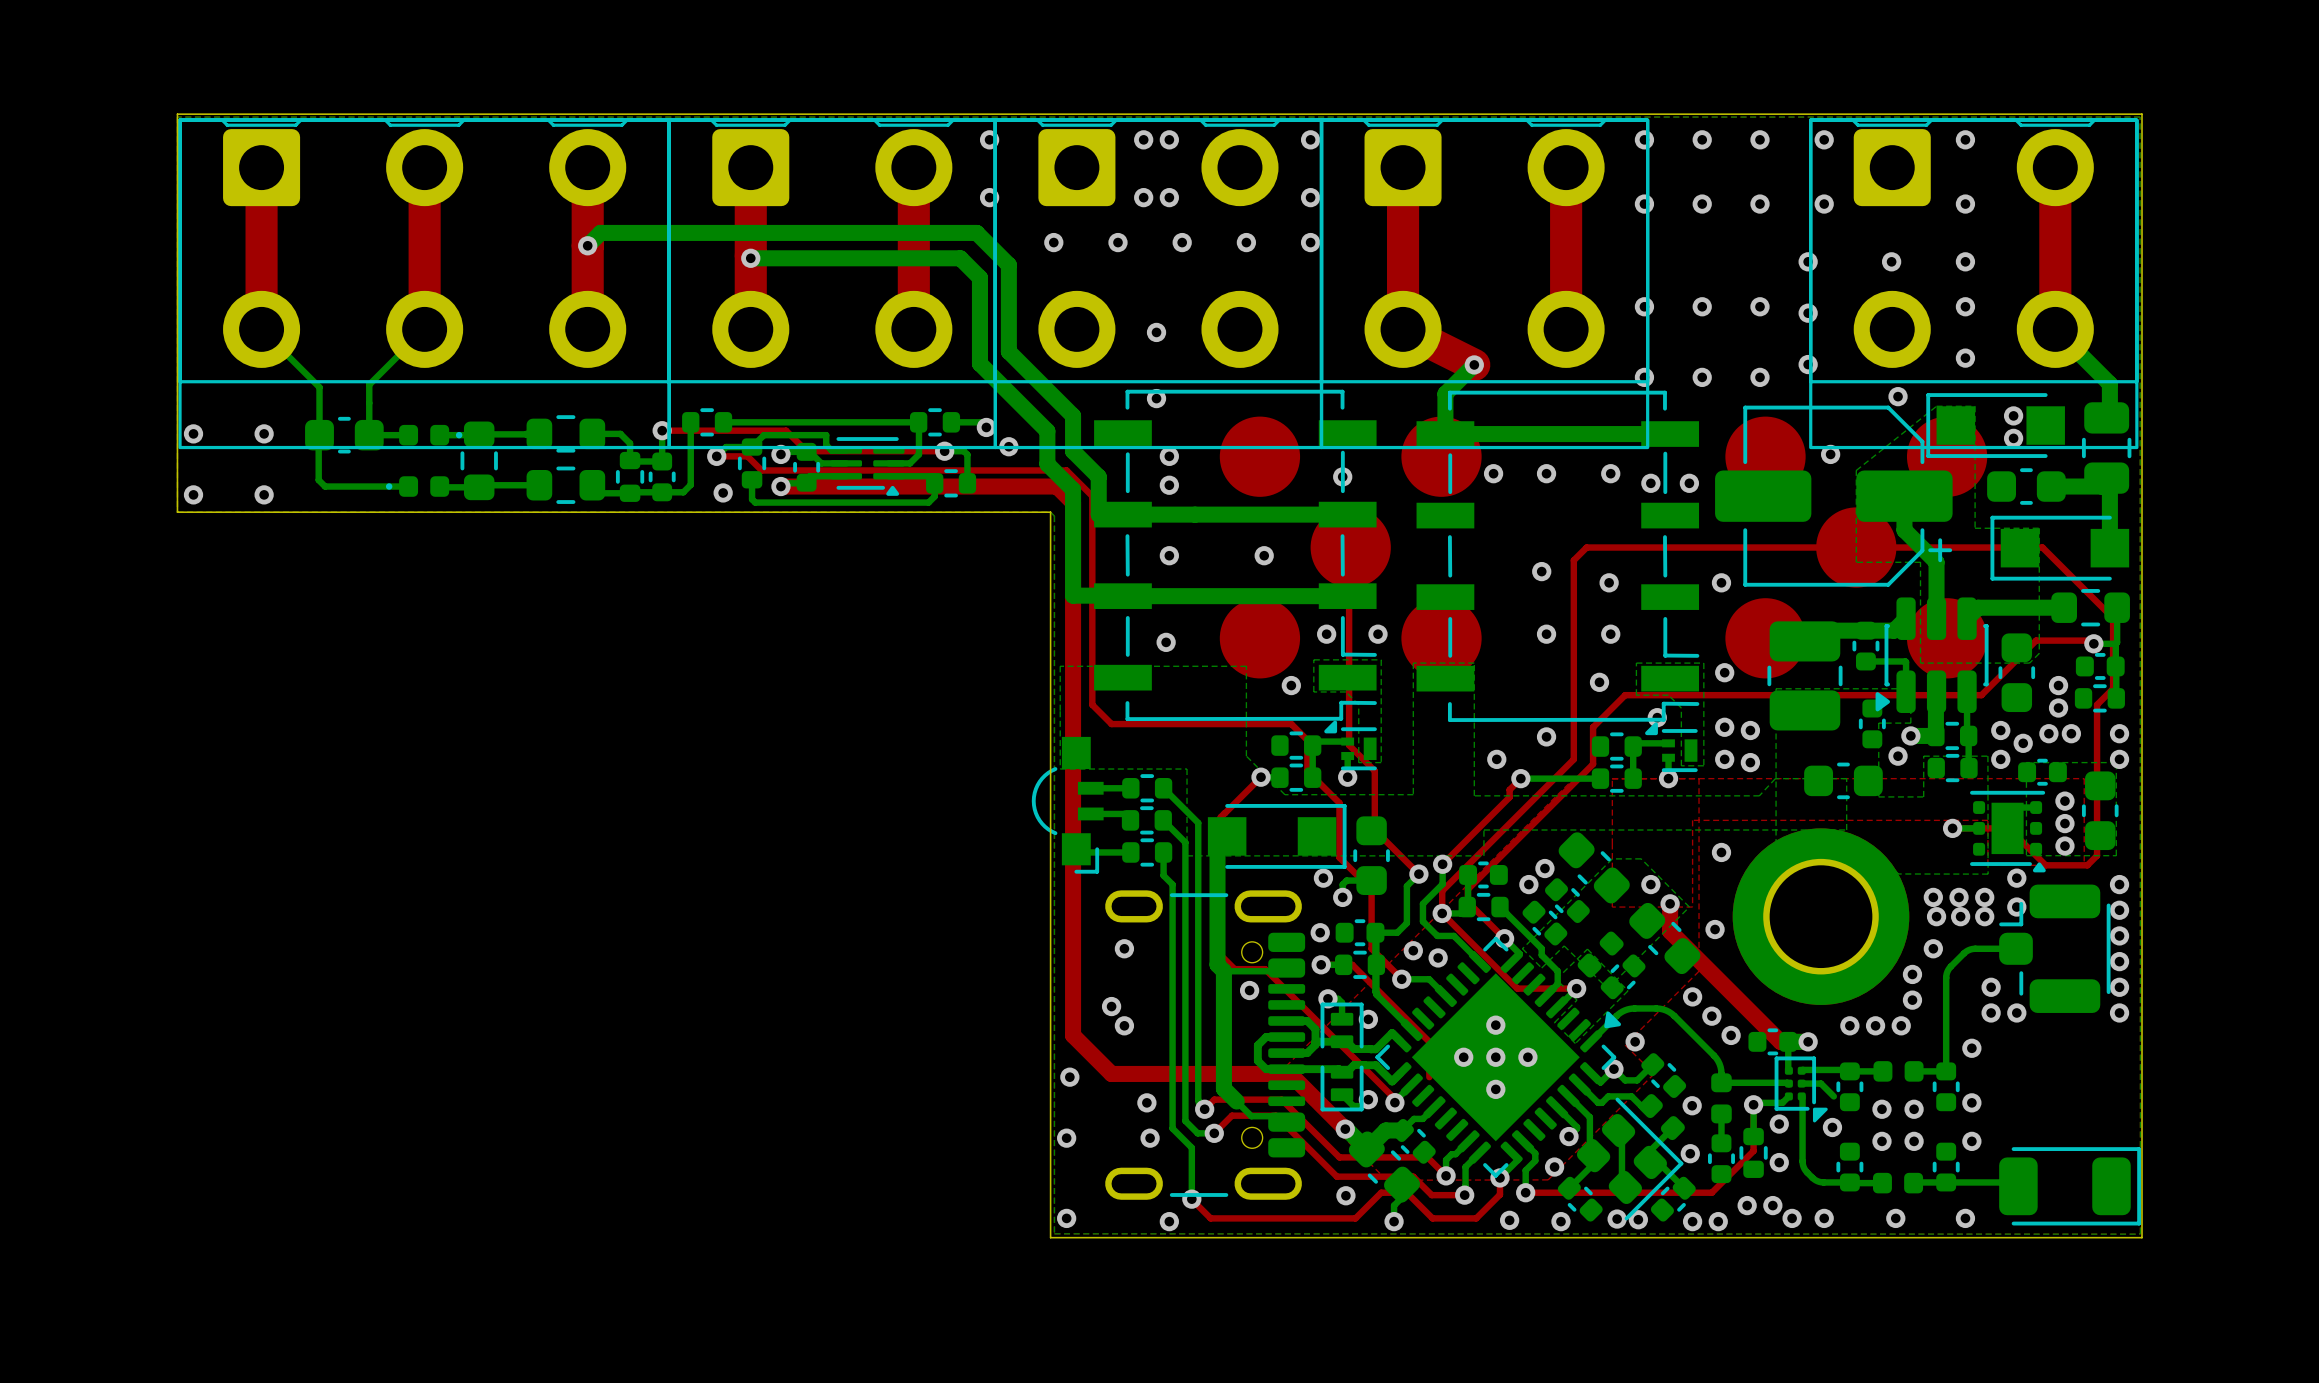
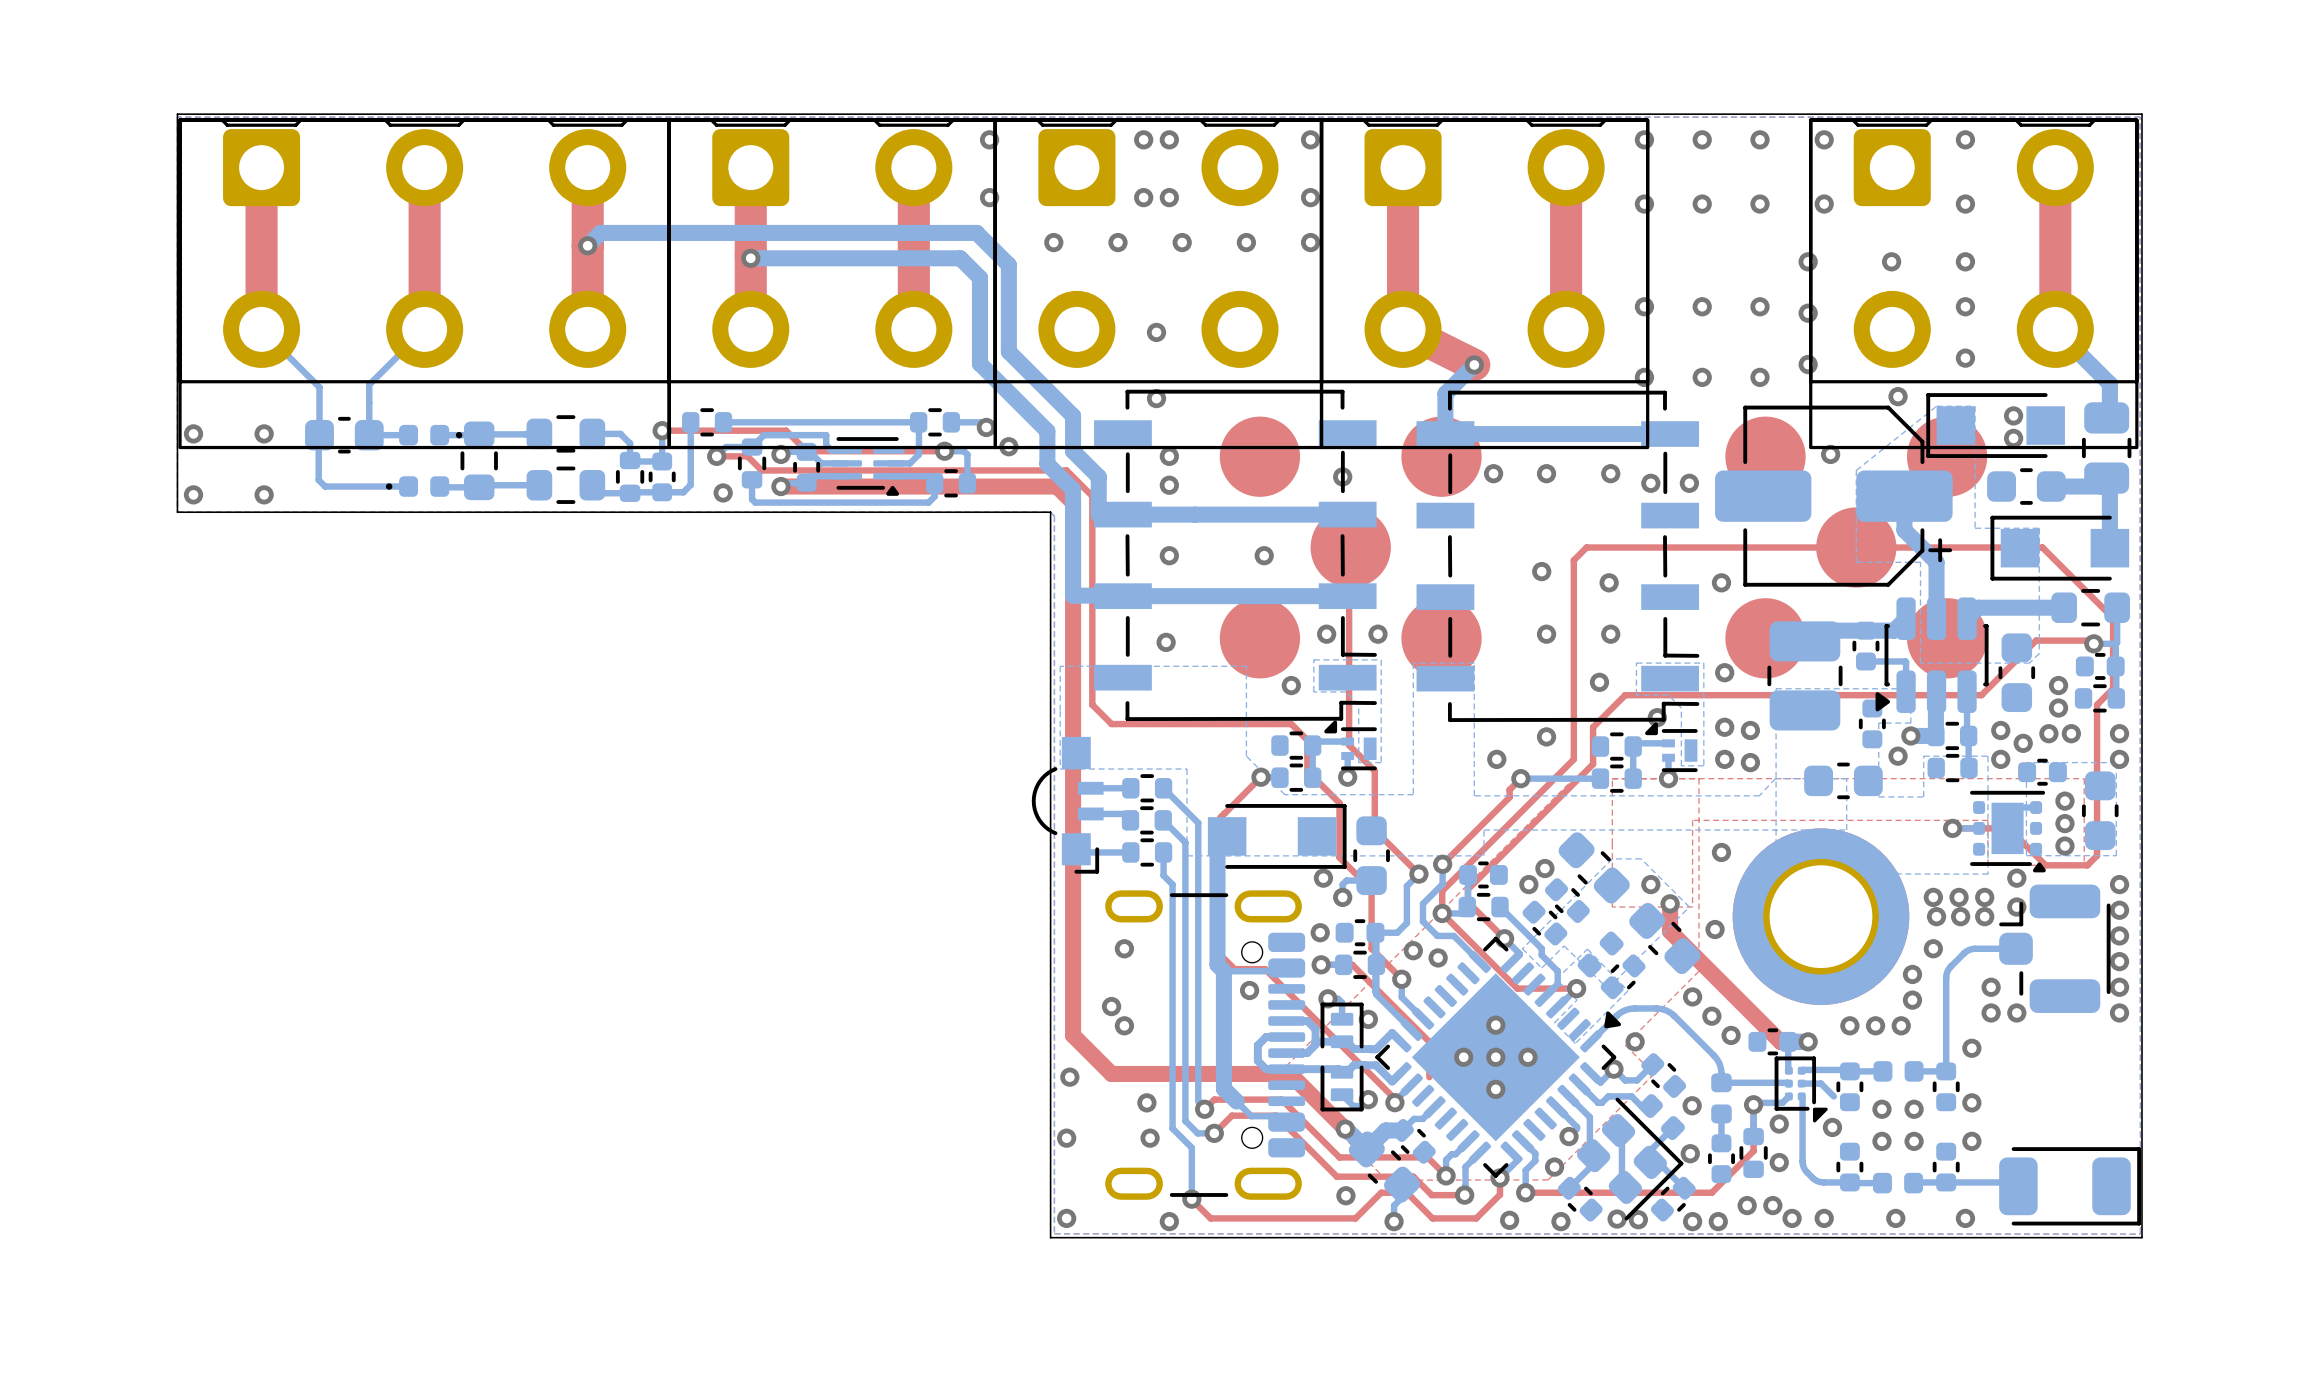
bottom track: (1401, 979) (1429, 979) (1445, 995) -> (1401, 979) (1401, 997) (1423, 1018)

